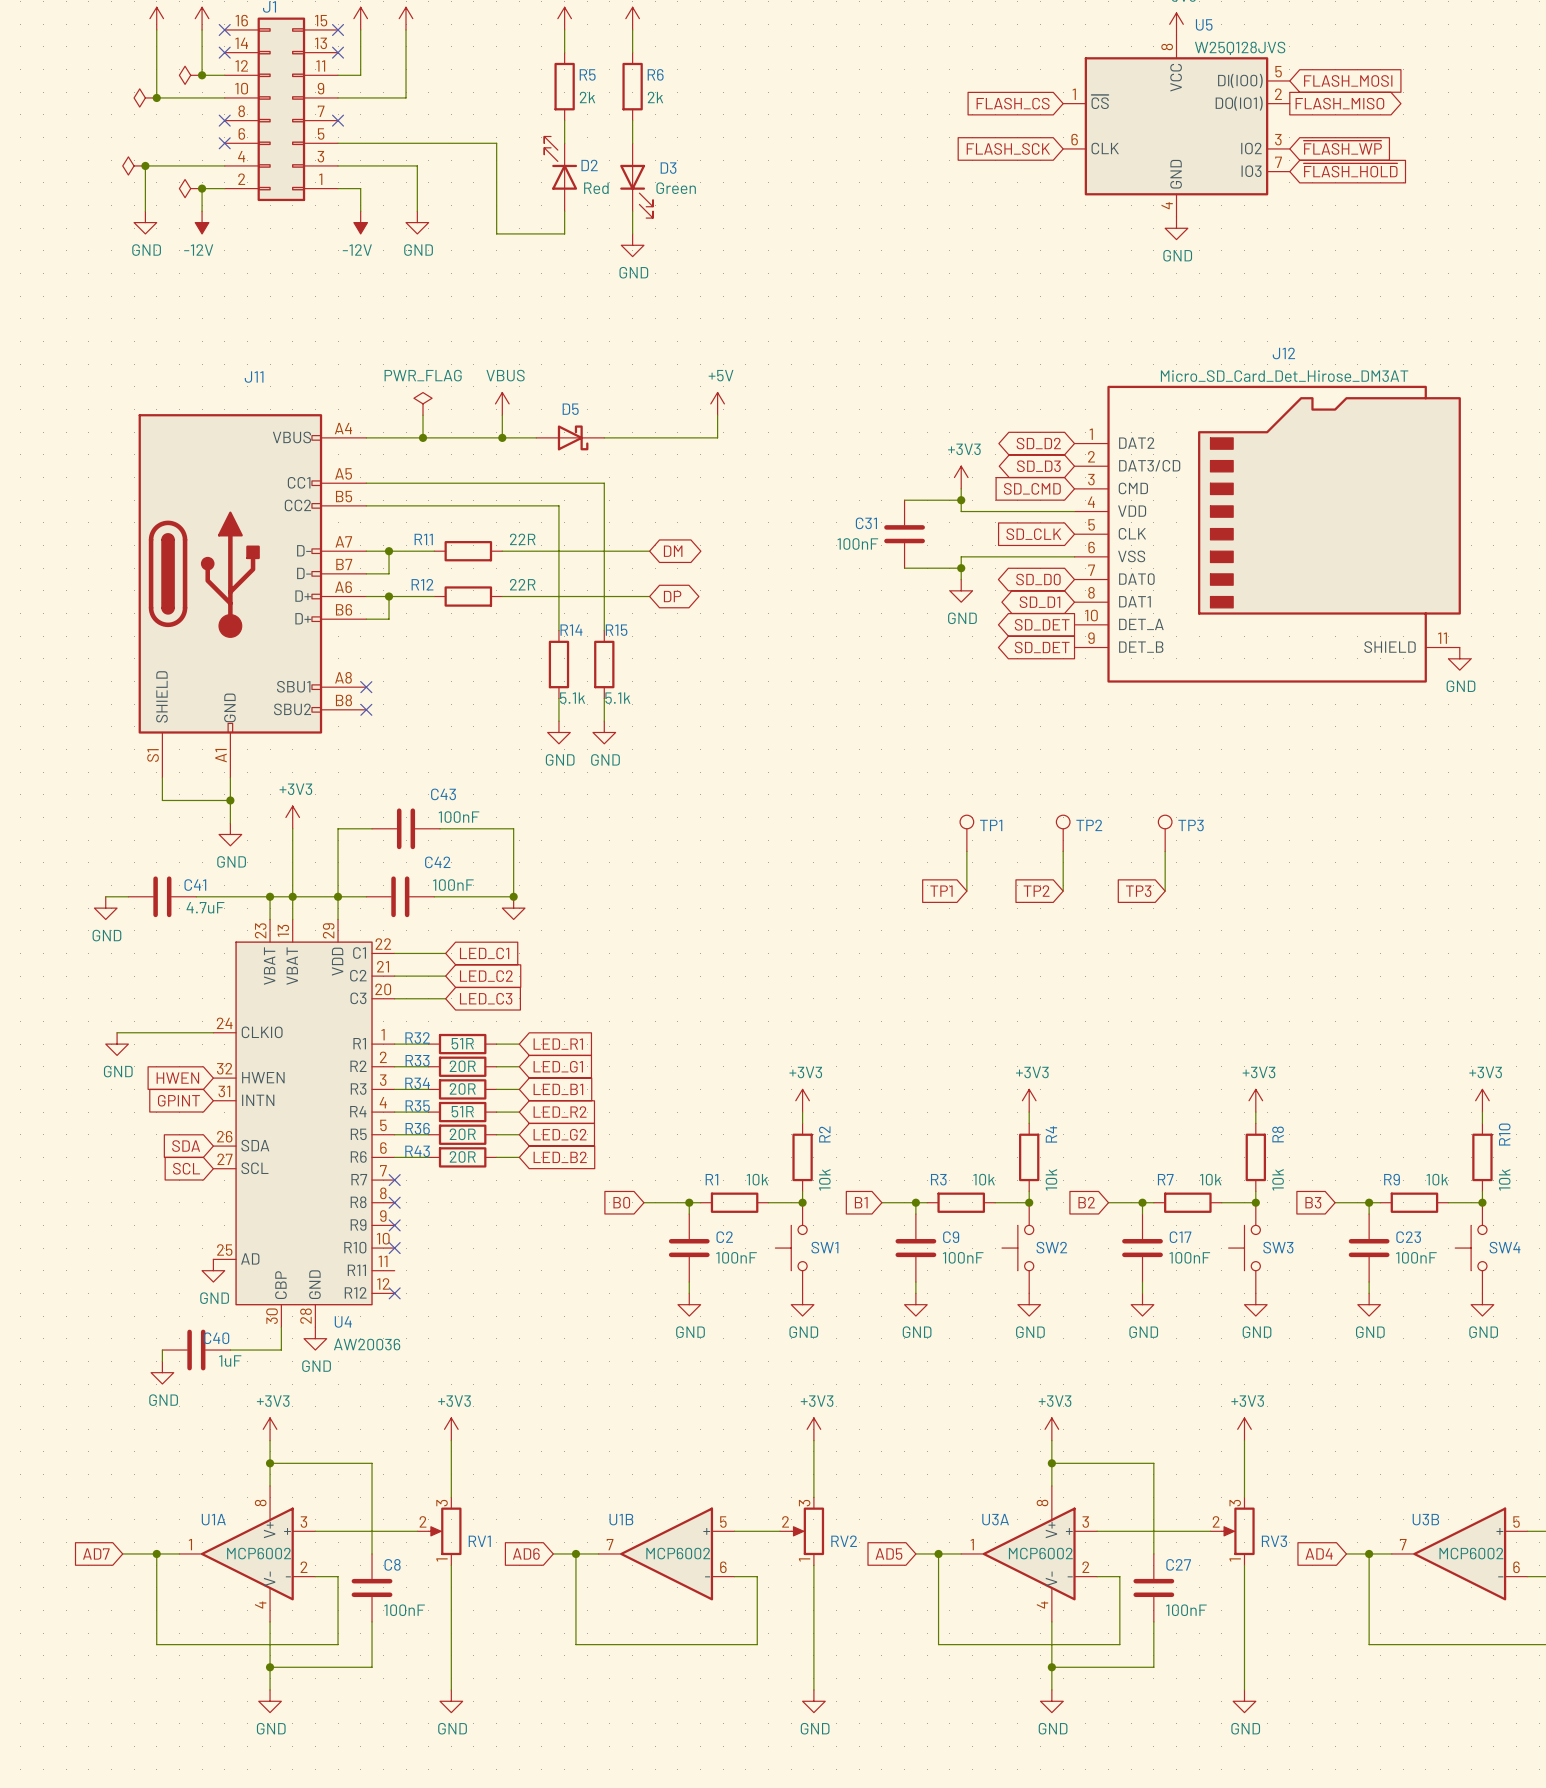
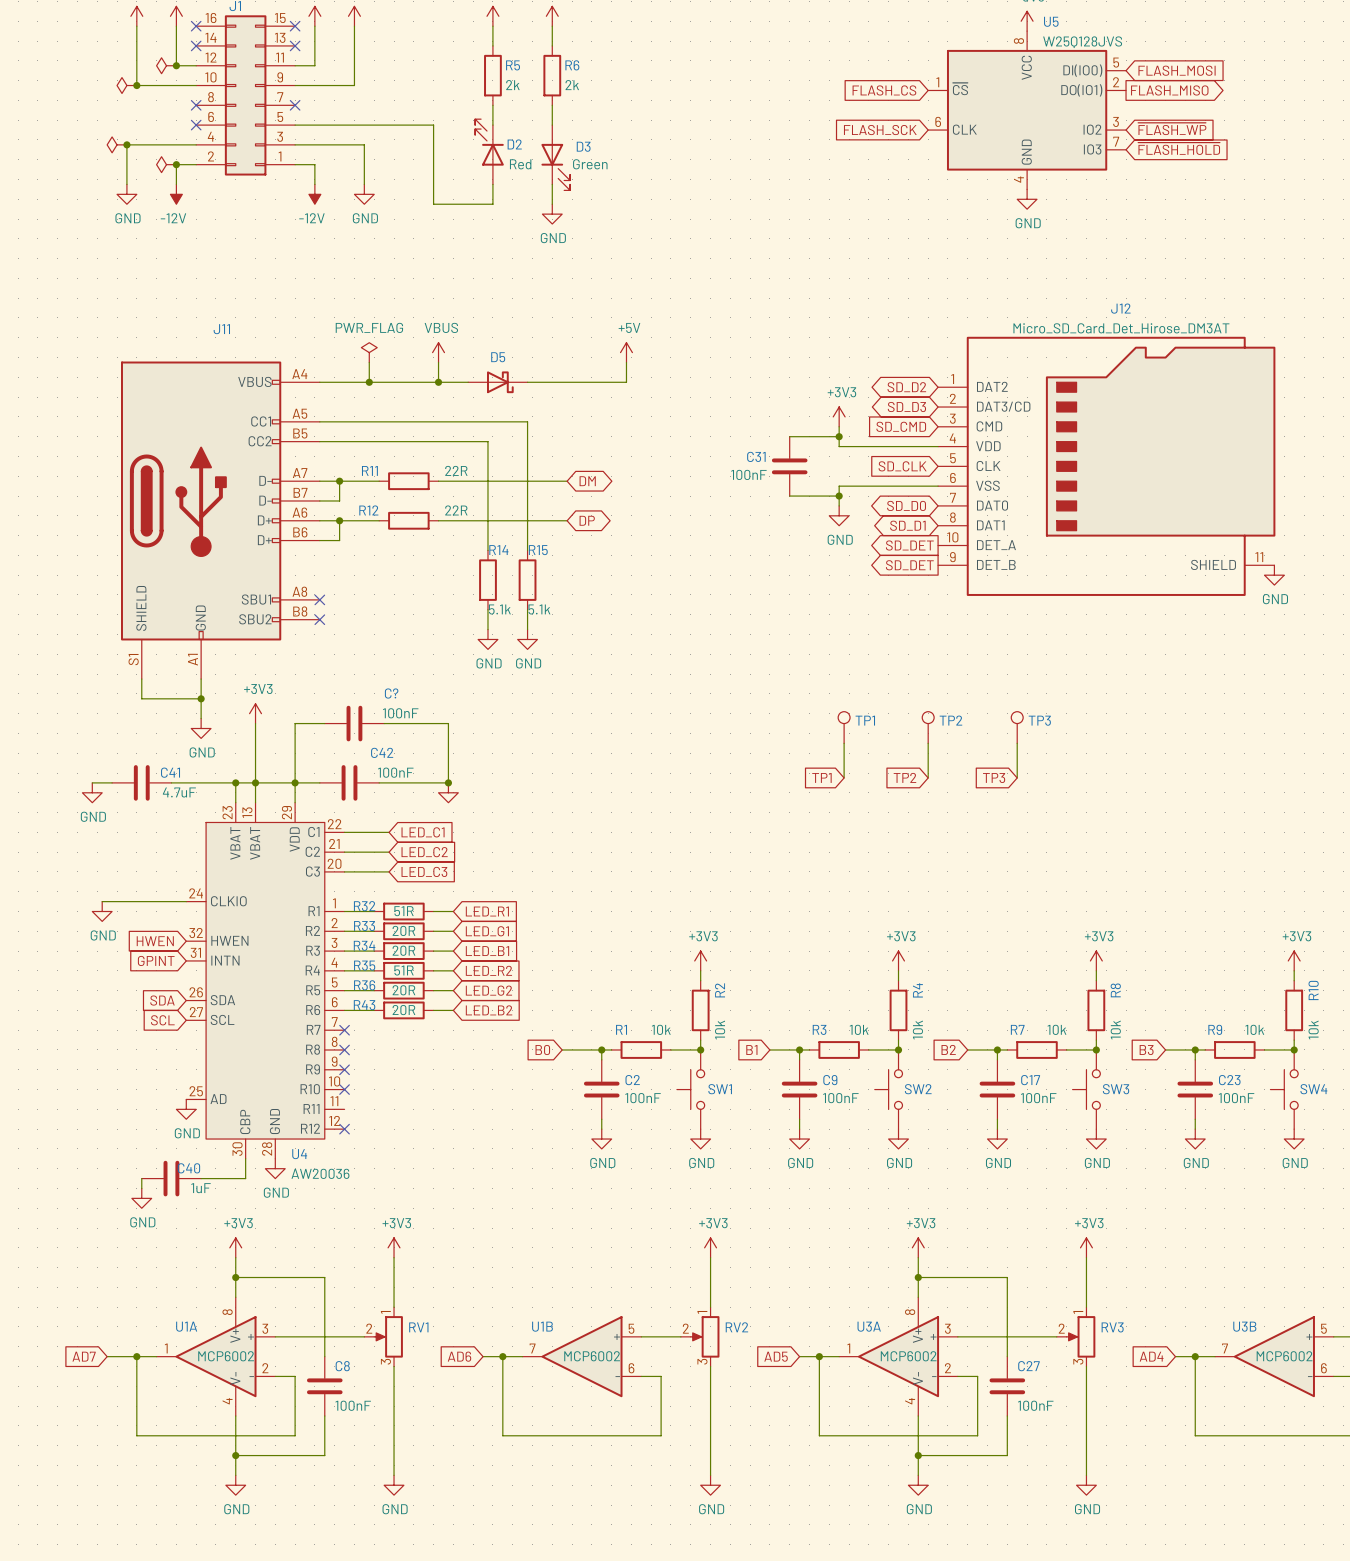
C43 name: C43 (443, 794) -> C? (391, 693)
RV1 flip: as is (445, 1531) -> up-down (388, 1336)
RV2 flip: as is (807, 1531) -> up-down (705, 1336)
RV3 flip: as is (1238, 1531) -> up-down (1081, 1336)

